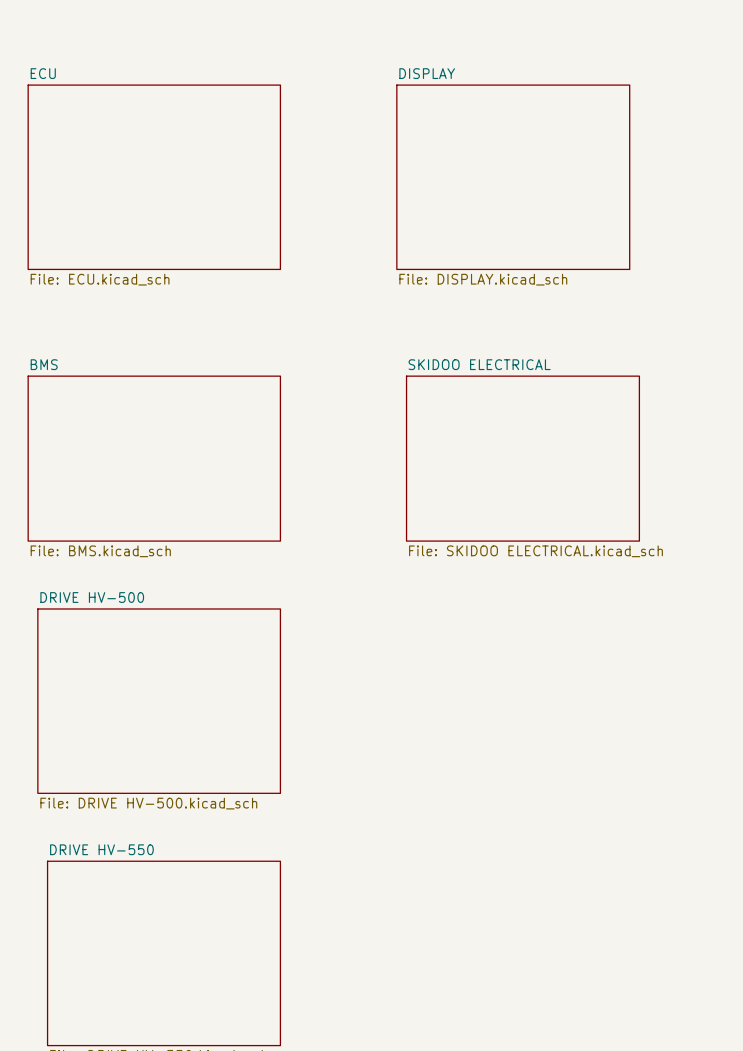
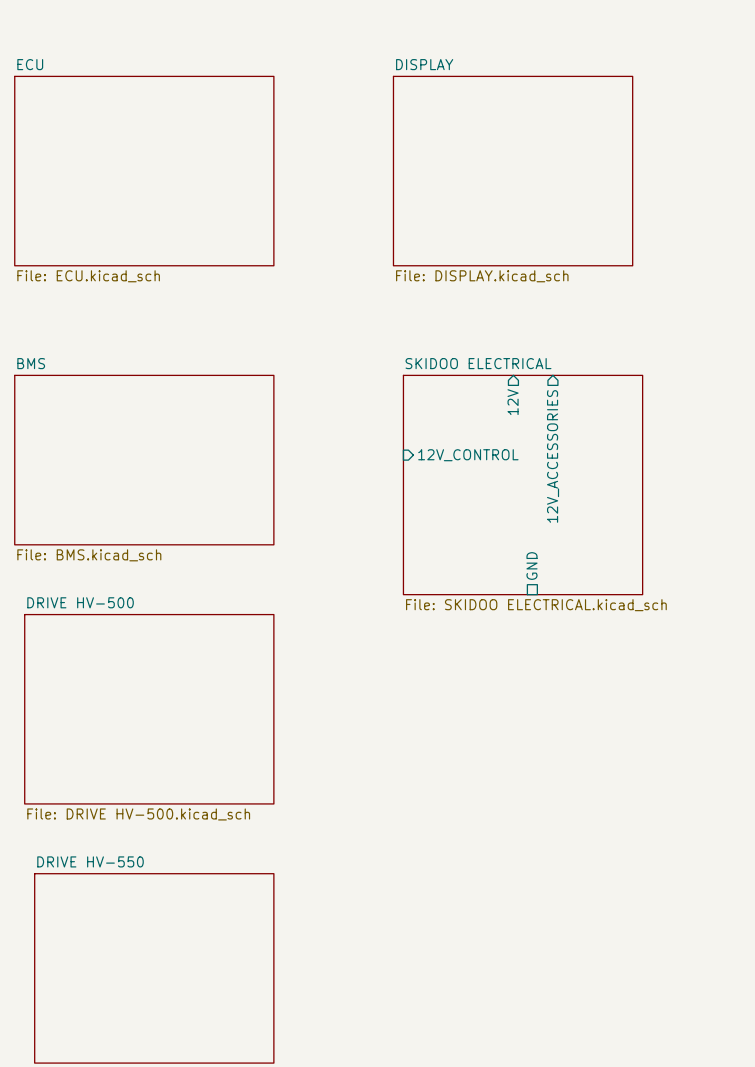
sheet pin: none -> 12V (513, 402)
sheet pin: none -> 12V_CONTROL (468, 455)
sheet pin: none -> 12V_ACCESSORIES (553, 456)
sheet SKIDOO ELECTRICAL: File: SKIDOO ELECTRICAL.kicad_sch (522, 458) -> none
sheet SKIDOO ELECTRICAL: none -> File: SKIDOO ELECTRICAL.kicad_sch (523, 485)
sheet pin: none -> GND (532, 566)

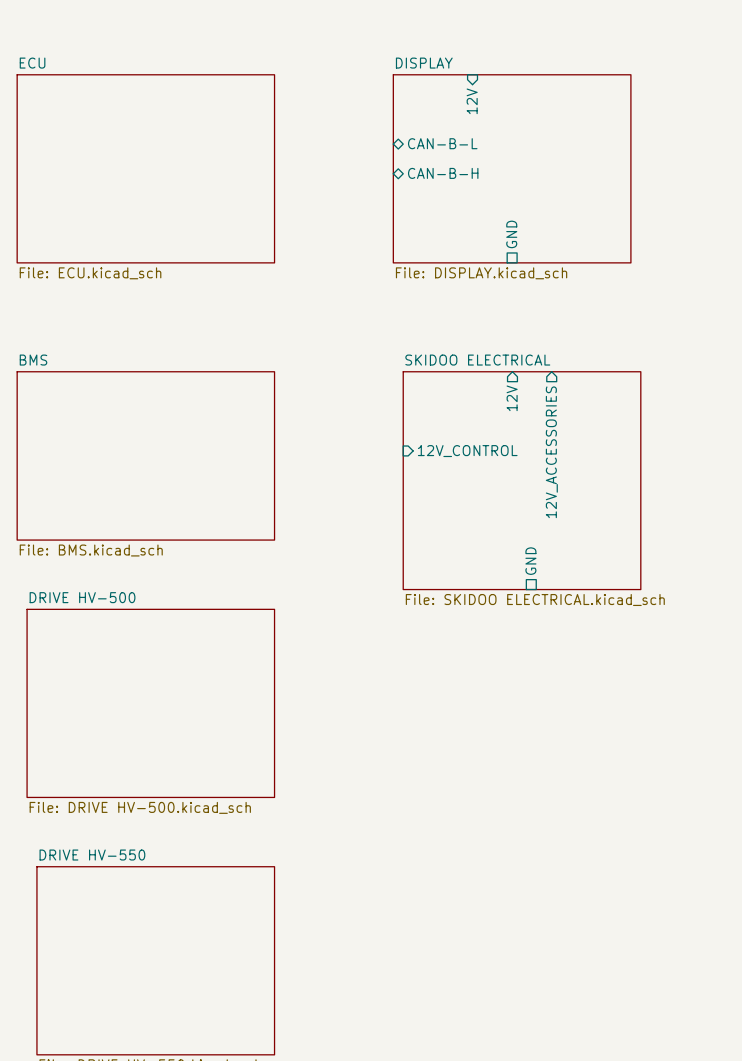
sheet pin: none -> 12V (472, 101)
sheet pin: none -> CAN-B-L (442, 143)
sheet pin: none -> CAN-B-H (443, 173)
sheet pin: none -> GND (511, 234)

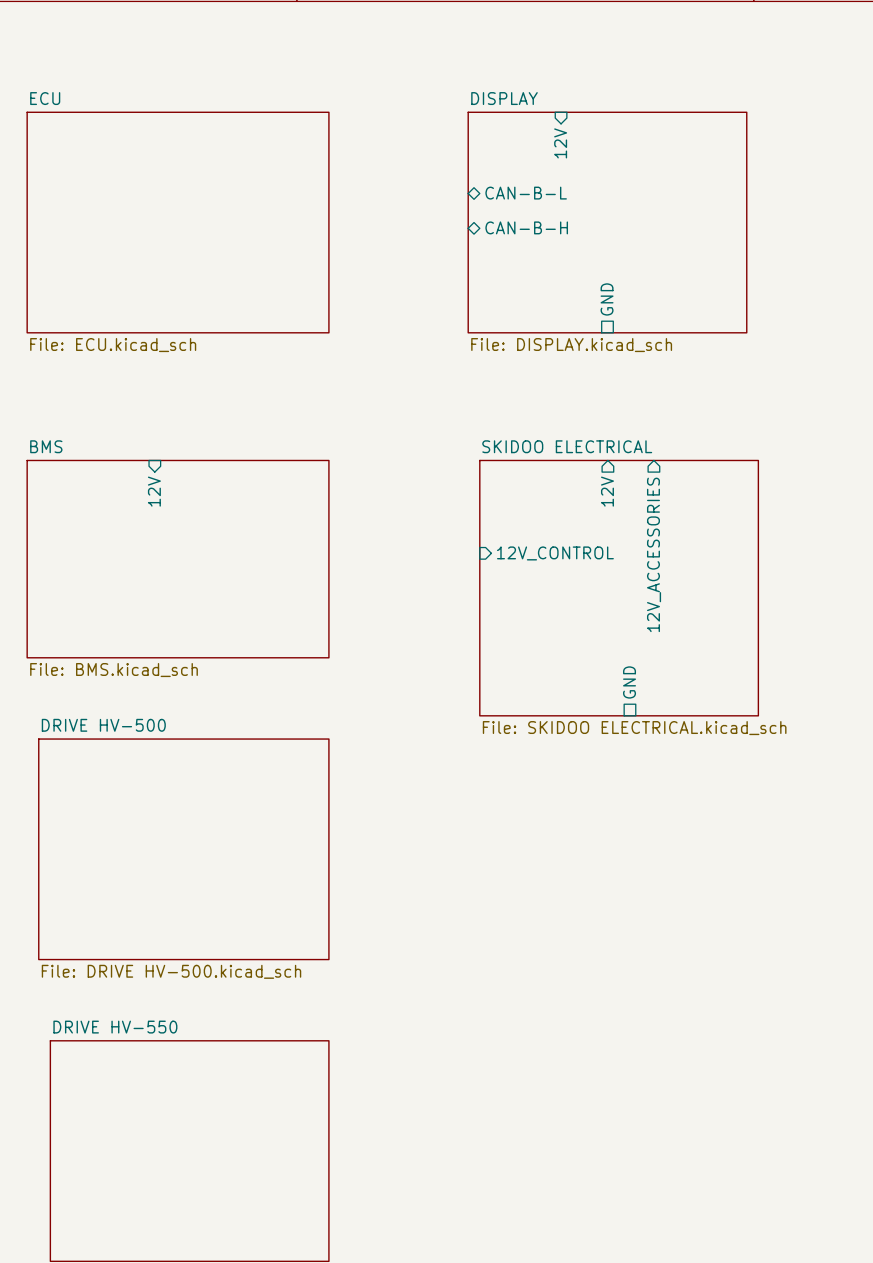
sheet pin: none -> 12V (154, 491)

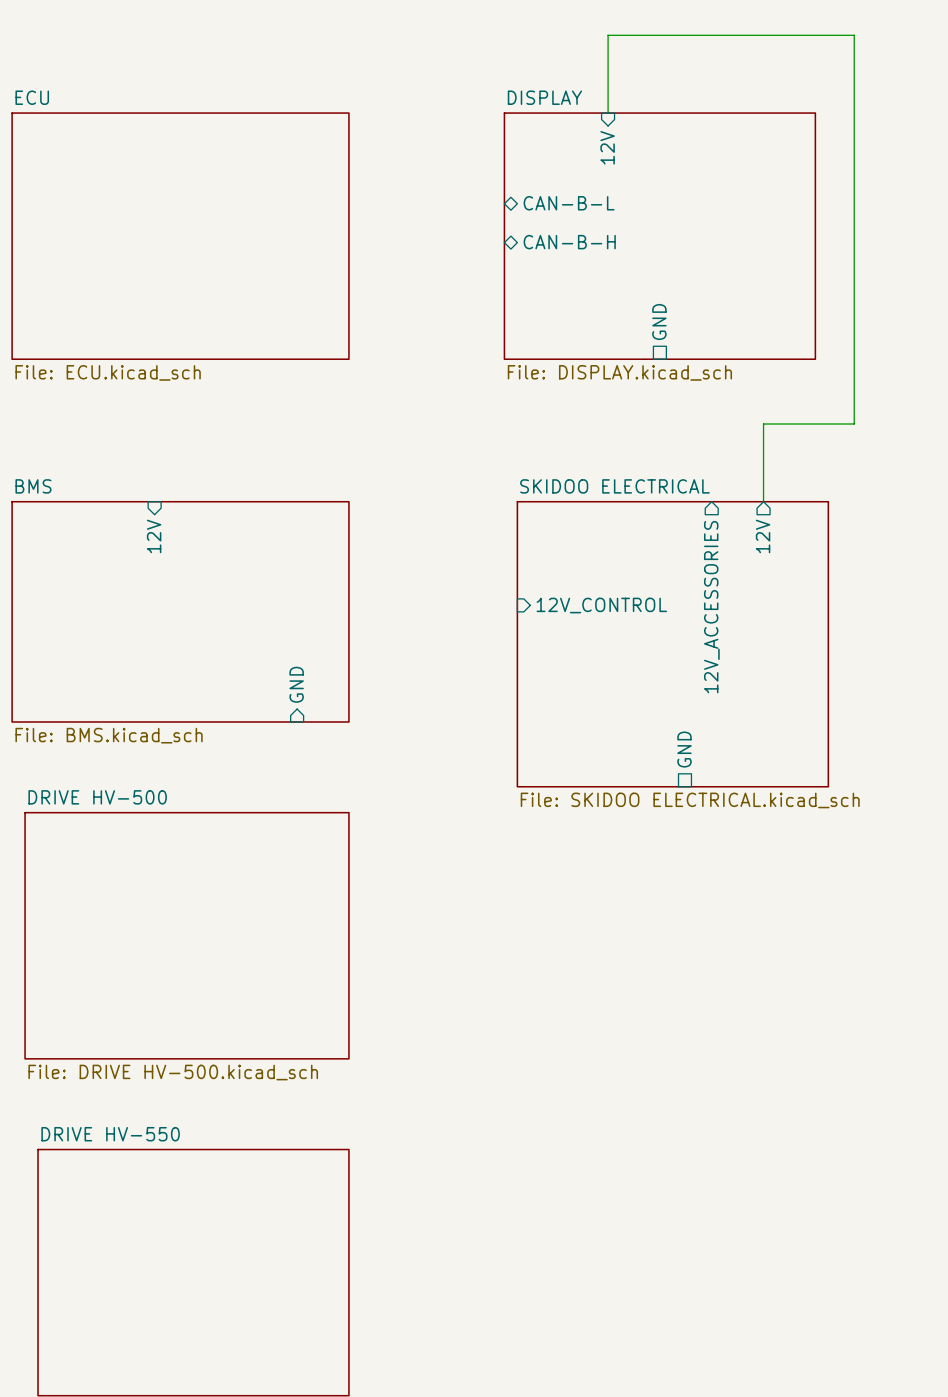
wire: none -> (608, 113) (608, 35) (854, 35) (854, 423) (763, 423) (763, 501)
sheet pin position: 12V (607, 491) -> 12V (763, 536)
sheet pin: none -> GND (296, 684)

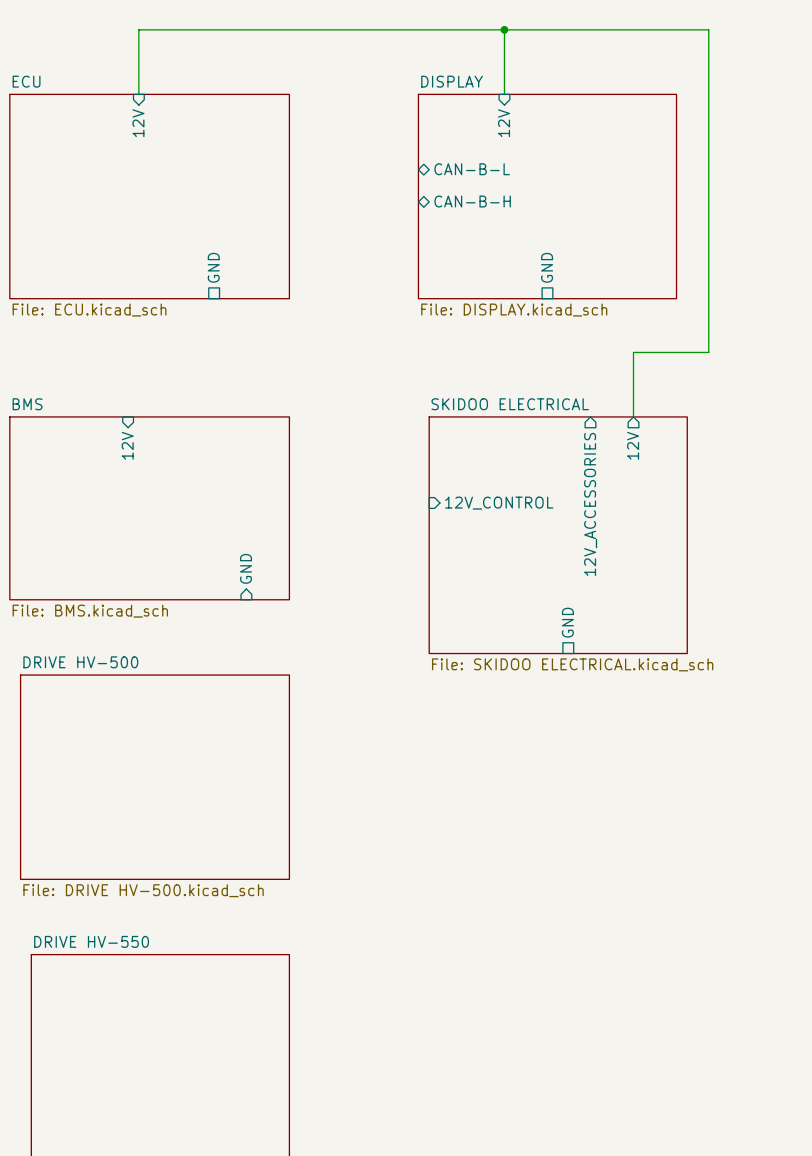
wire: none -> (504, 29) (138, 29) (138, 94)
junction: none -> (504, 29)
sheet pin: none -> 12V (138, 123)
sheet pin: none -> GND (213, 267)

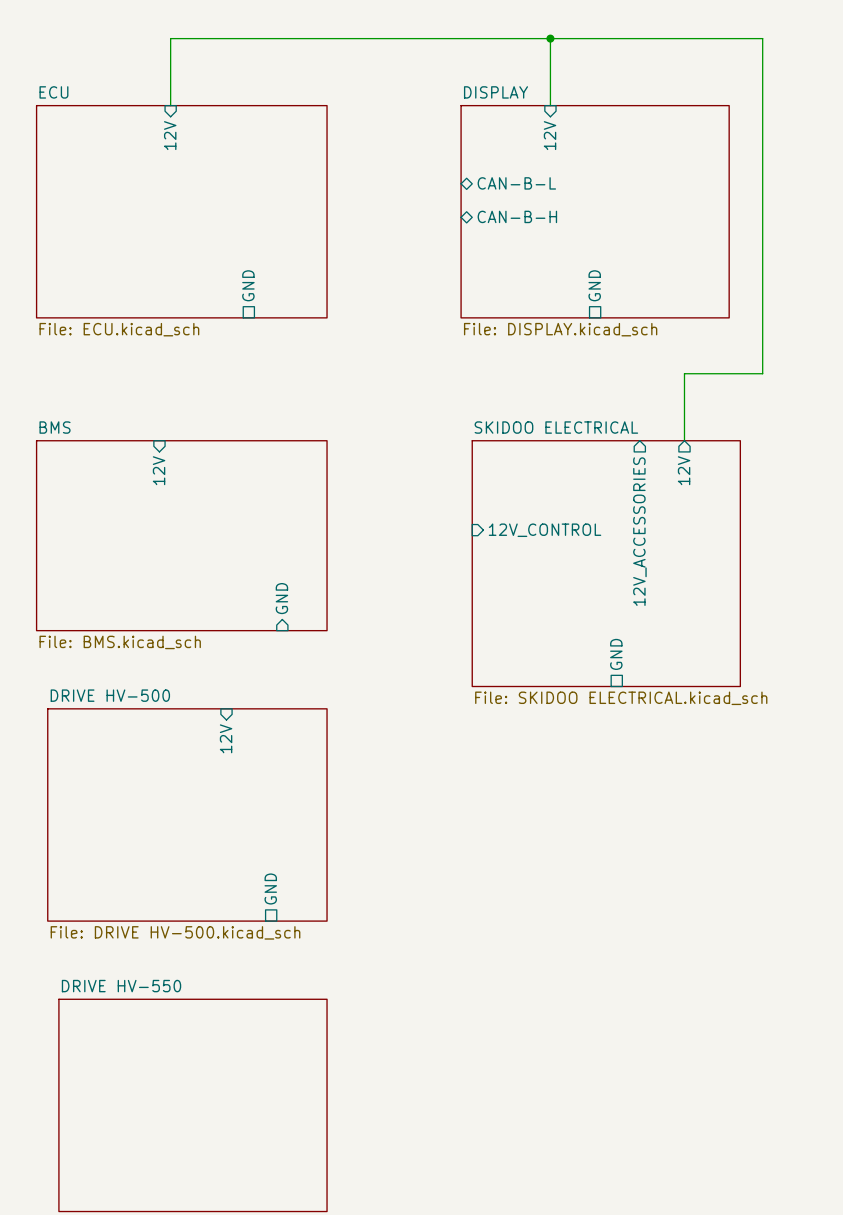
sheet pin: none -> 12V (226, 738)
sheet pin: none -> GND (270, 889)

